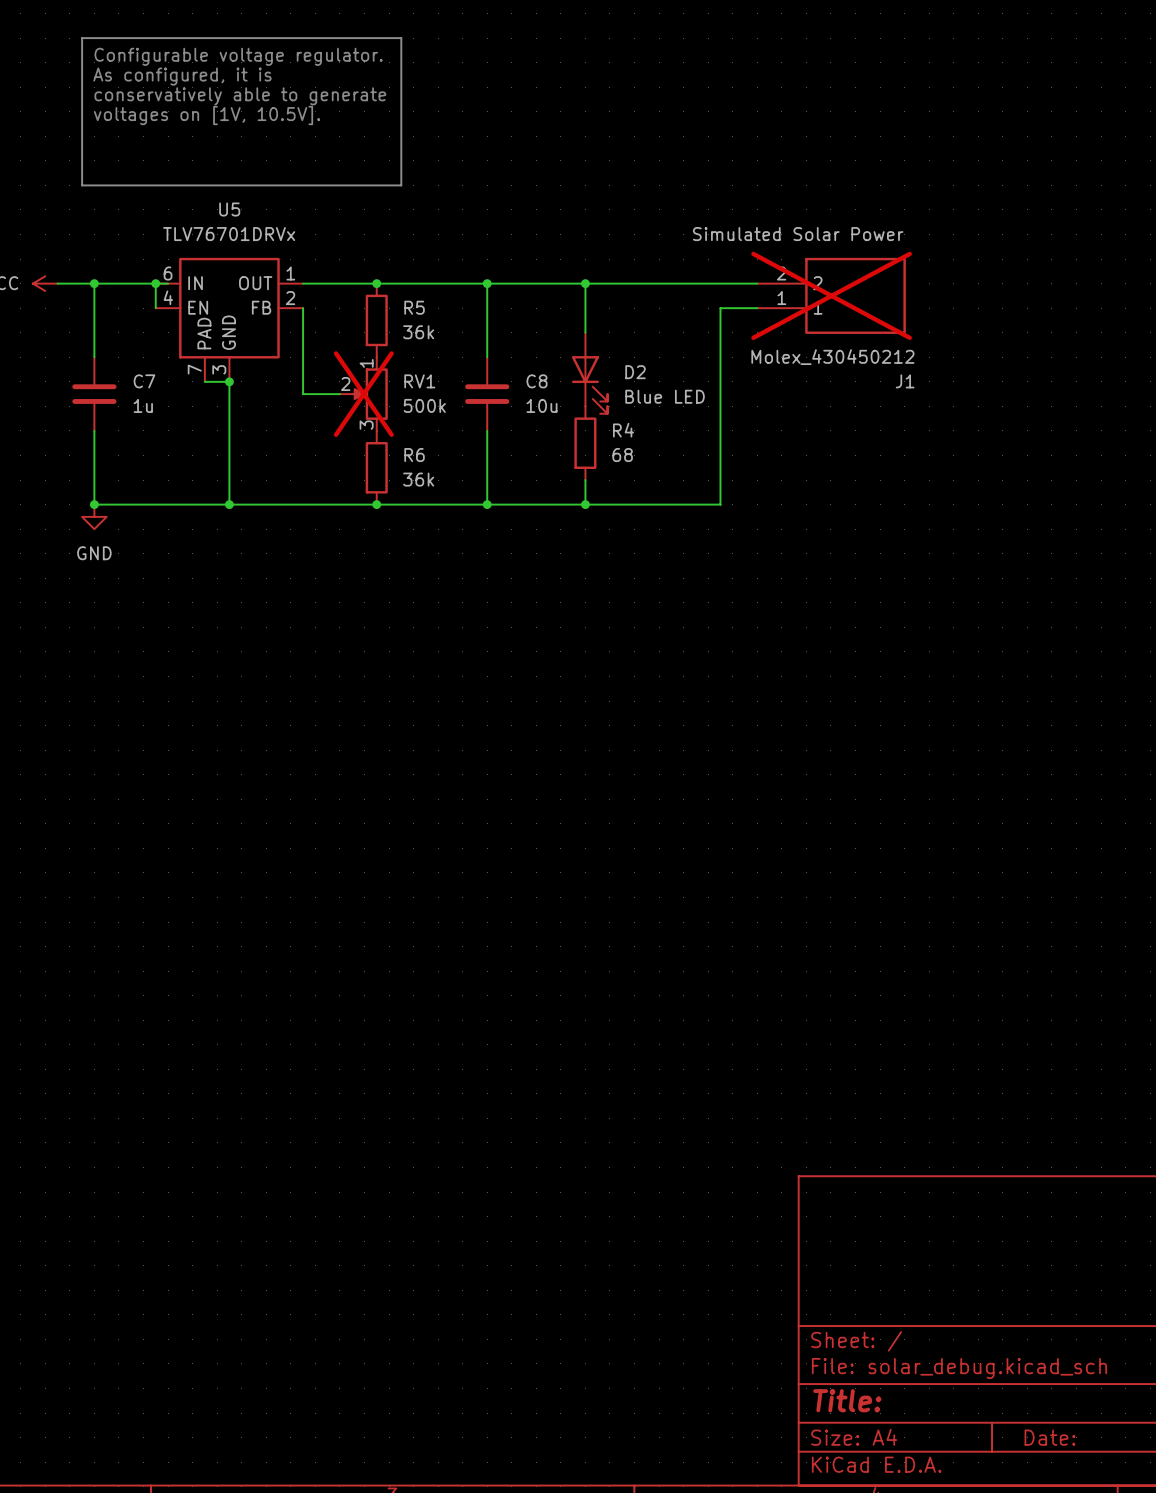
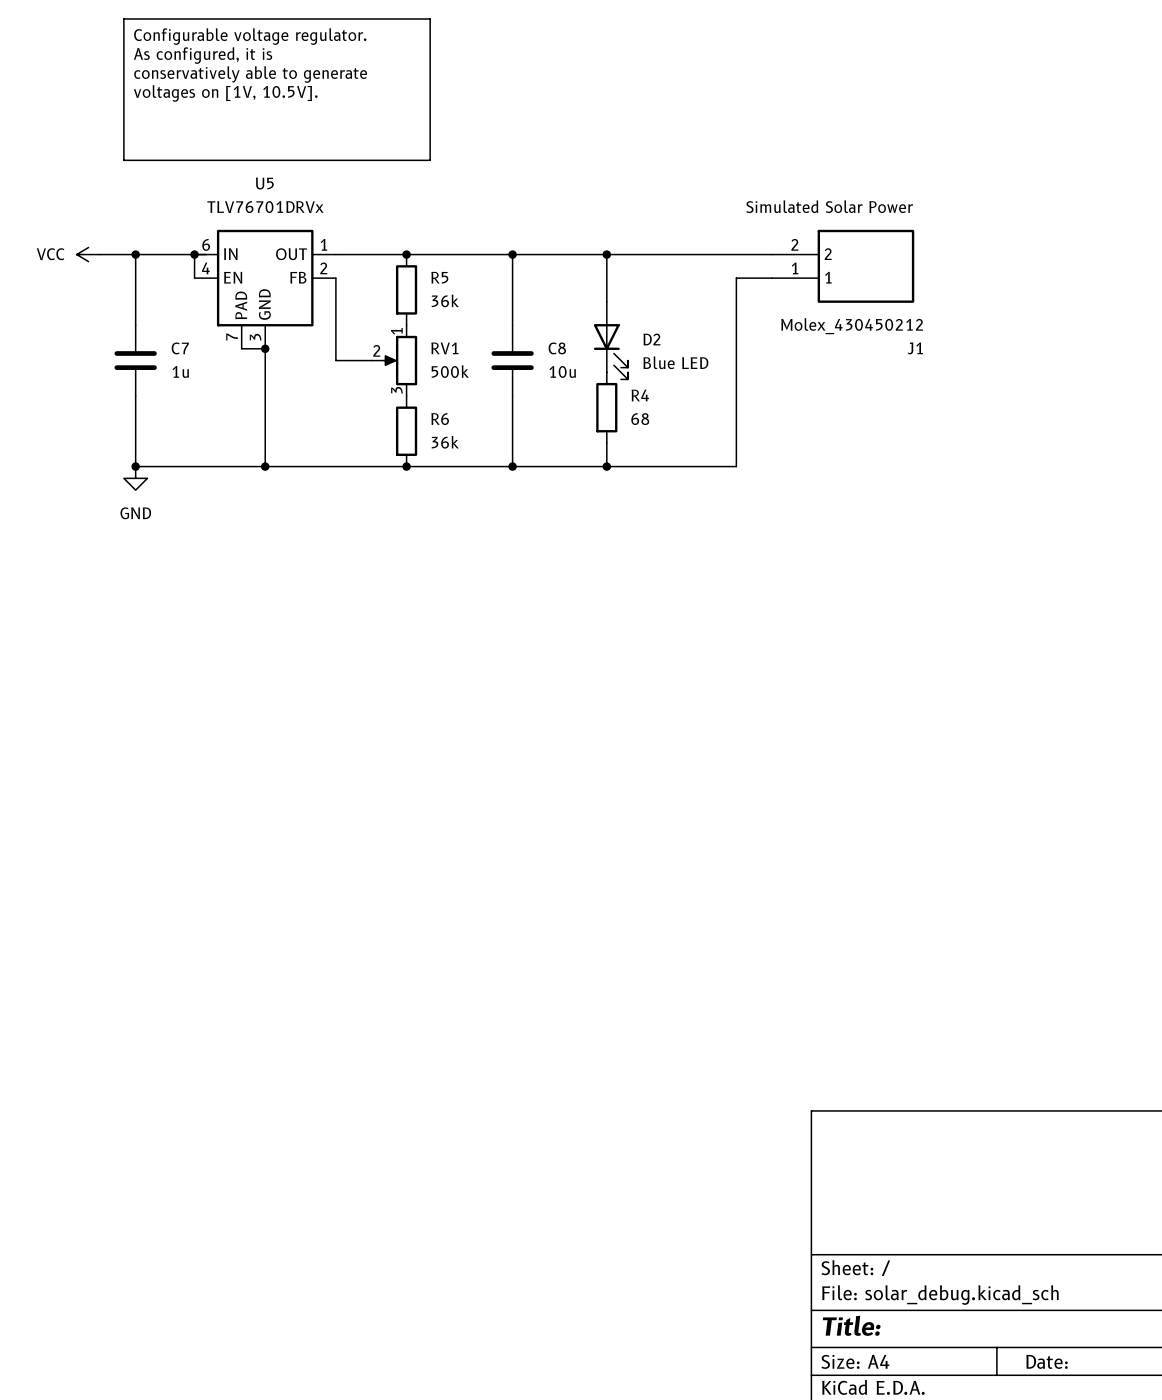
J1 do-not-place cross: (831, 295) -> none
RV1 do-not-place cross: (363, 394) -> none

